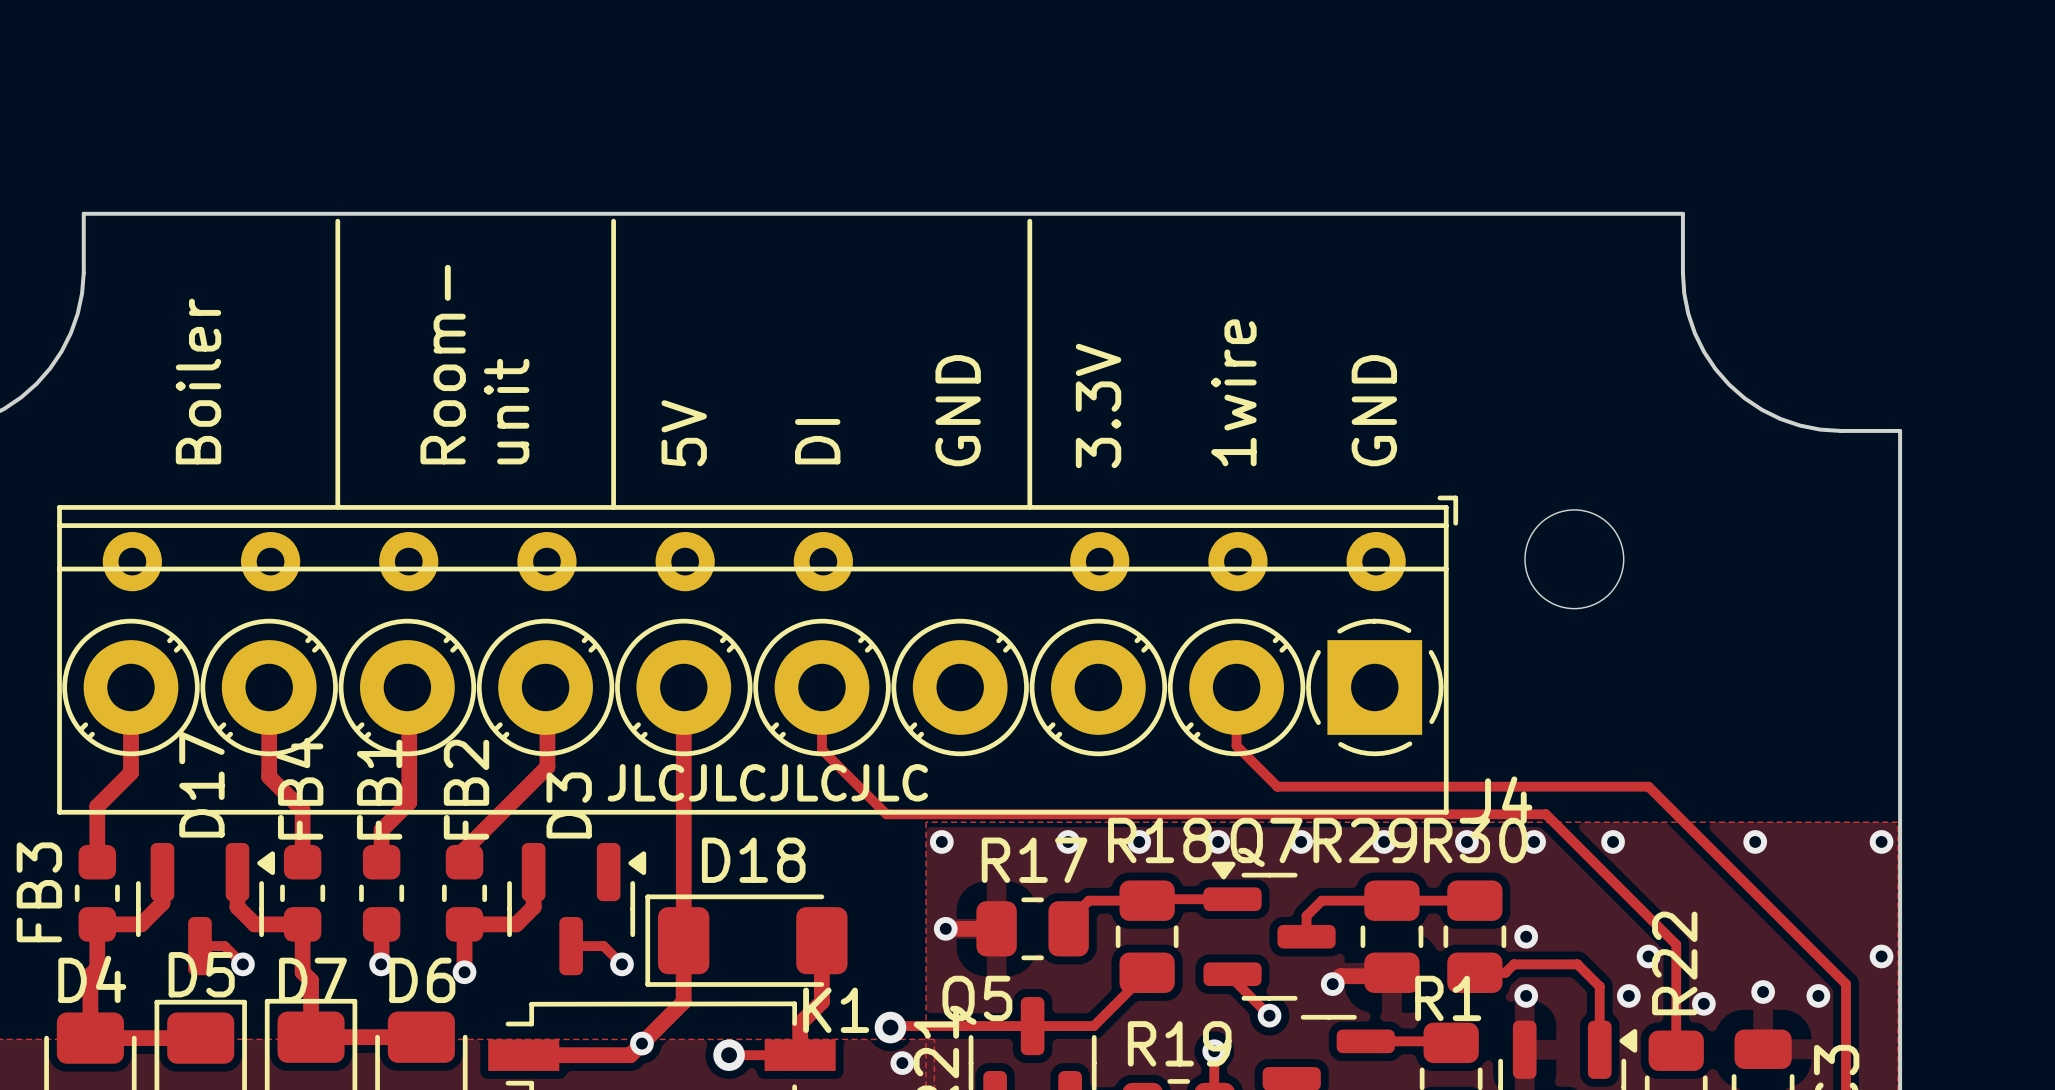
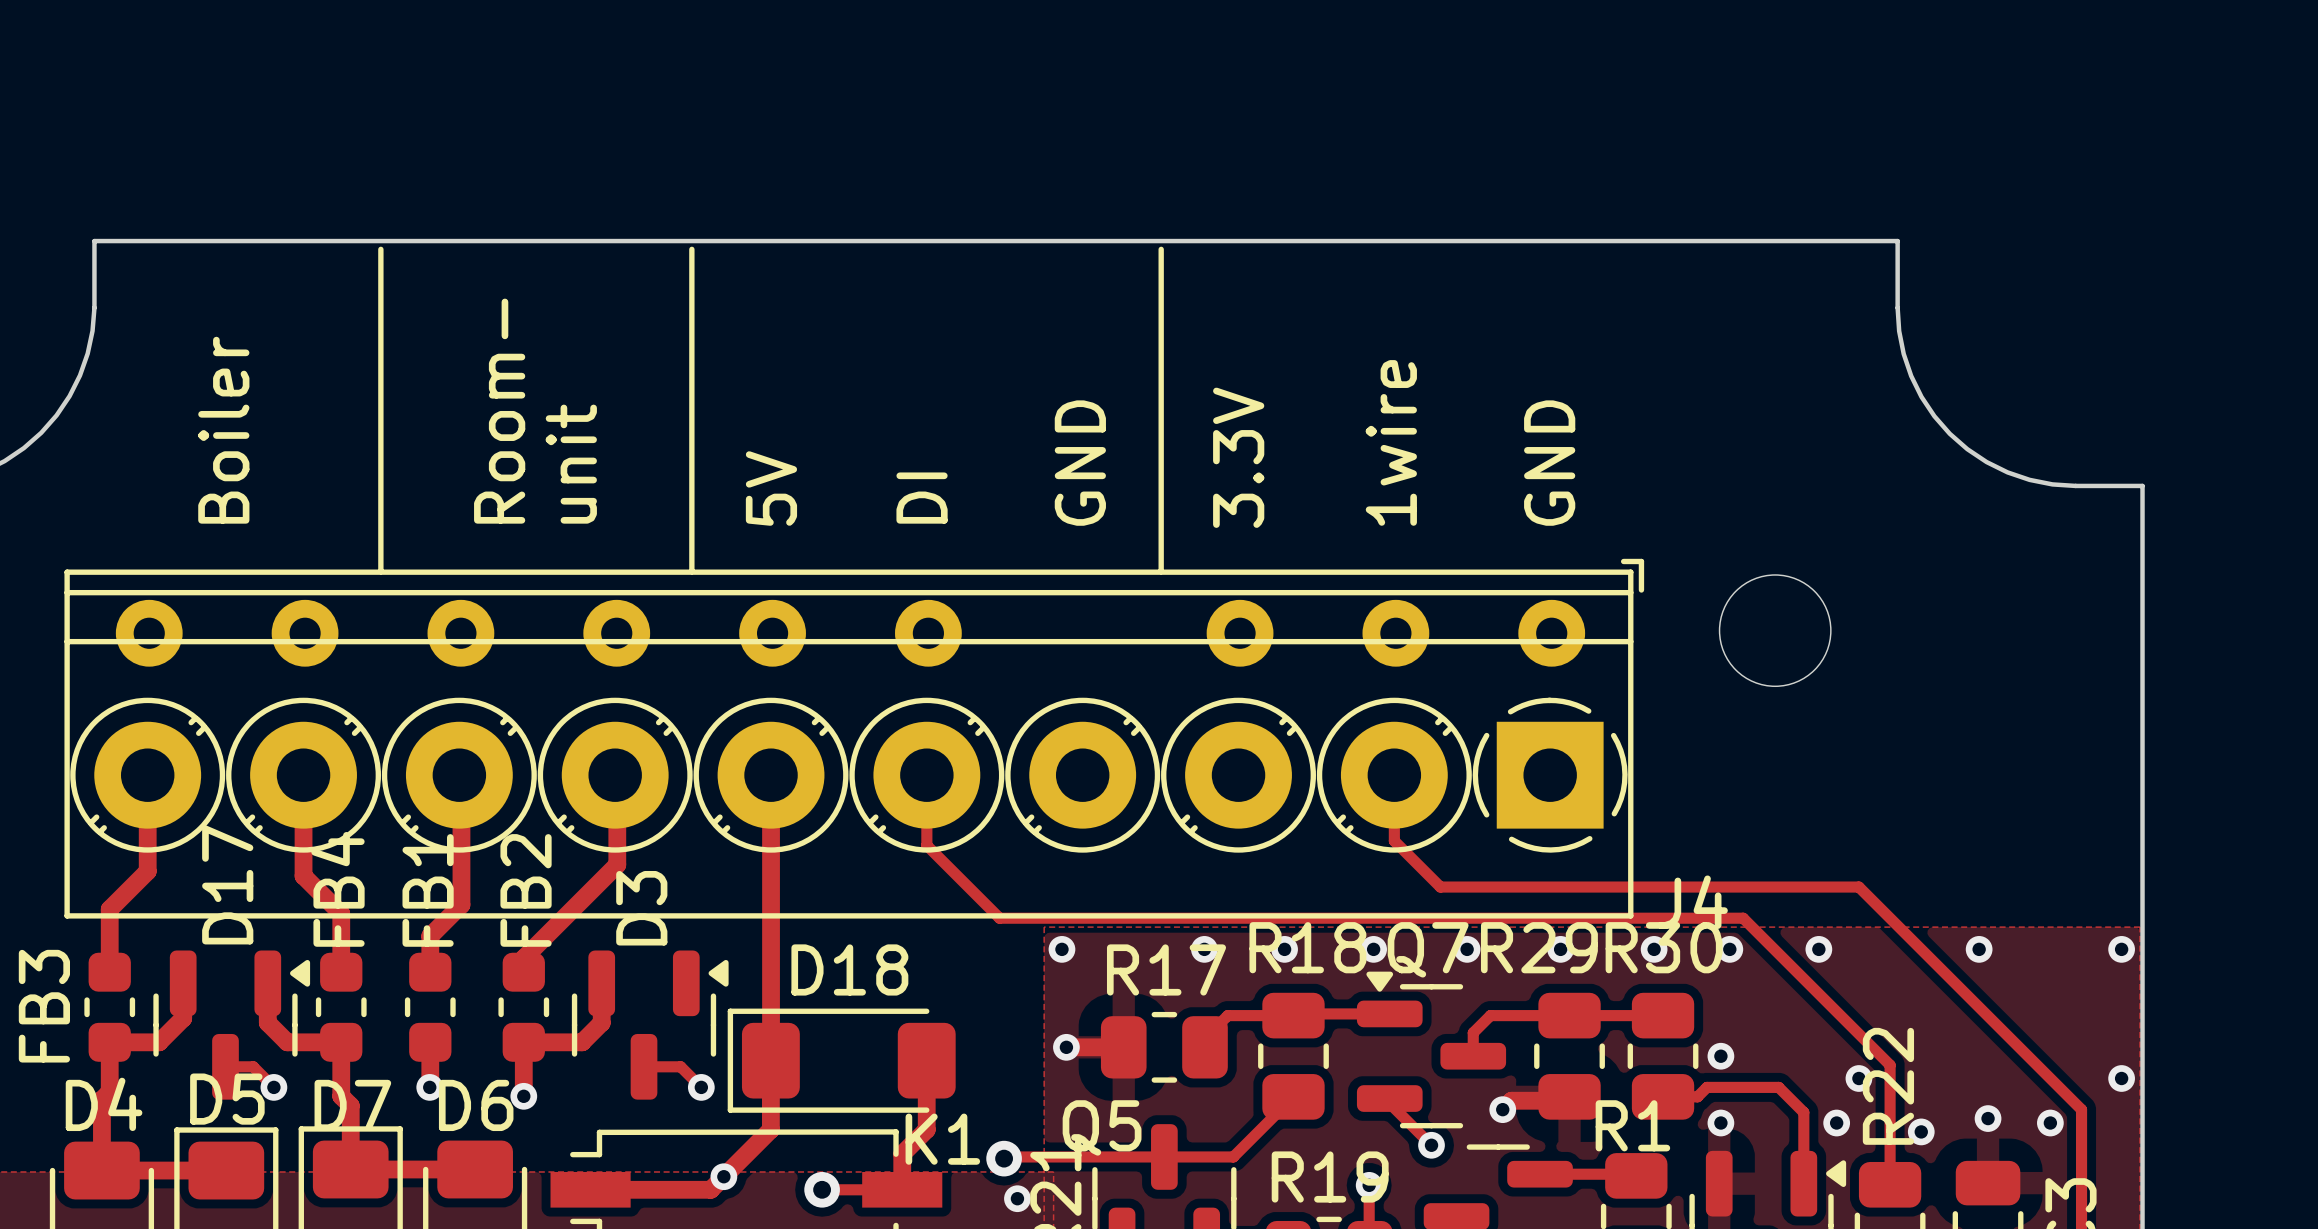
text: JLCJLCJLCJLC (767, 782) -> none

